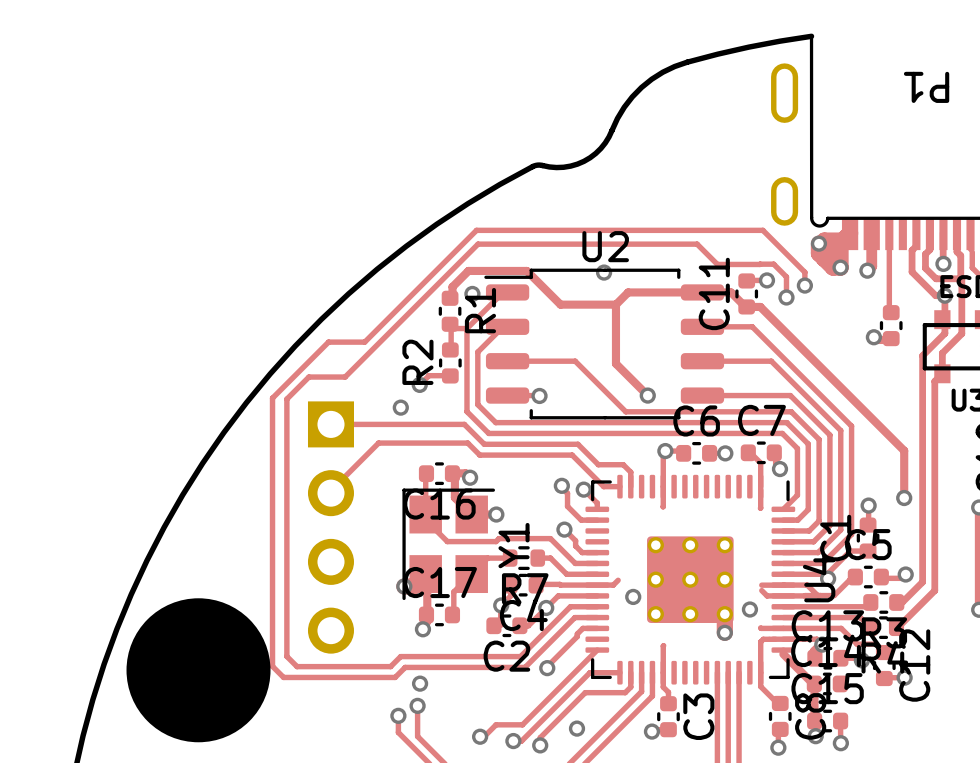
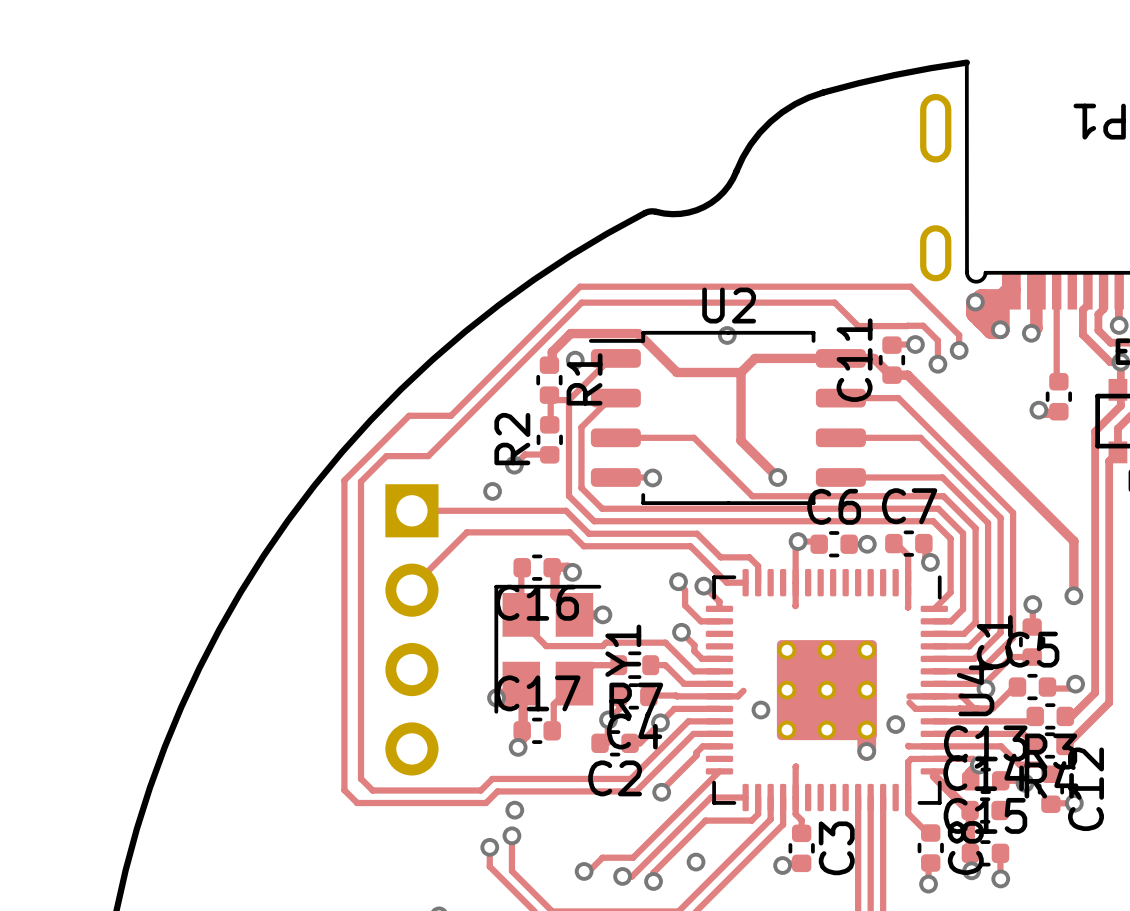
drawing: [126, 598, 271, 743] -> none

